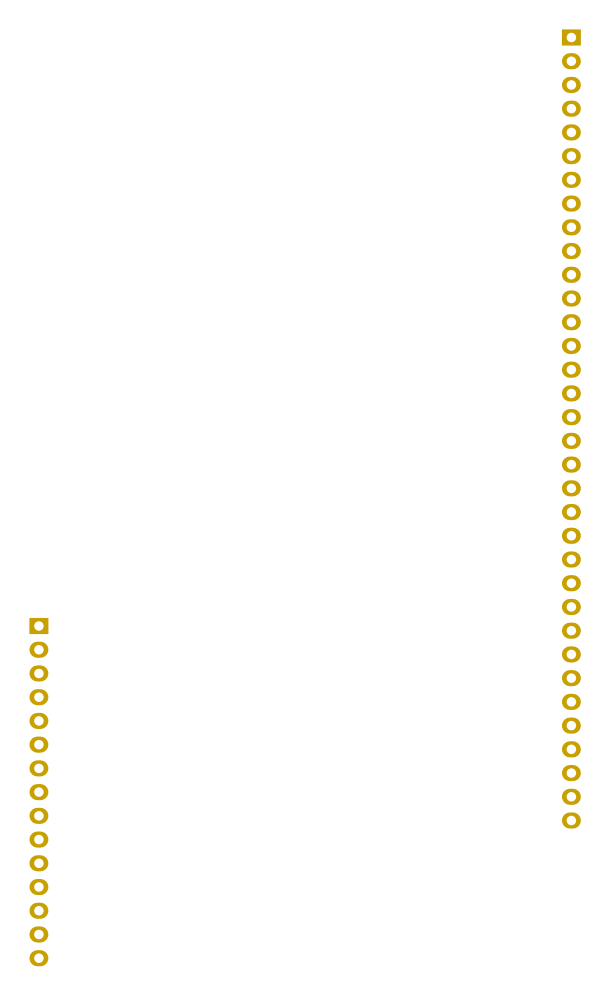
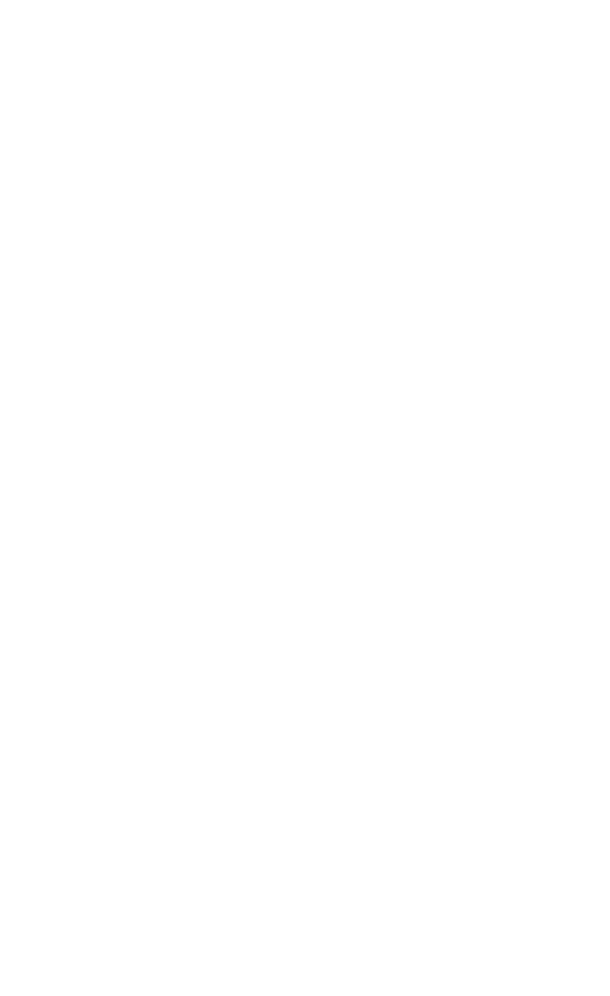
part: (571, 429) -> none
part: (38, 792) -> none

